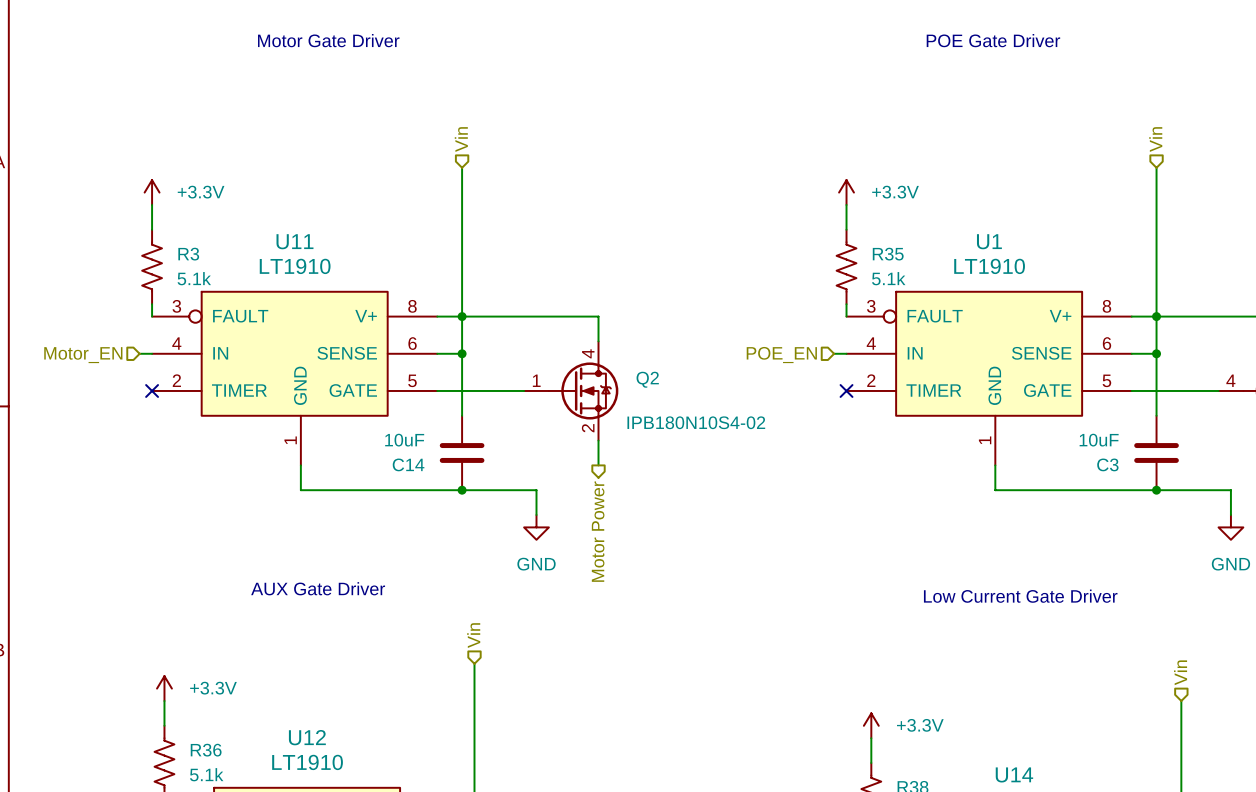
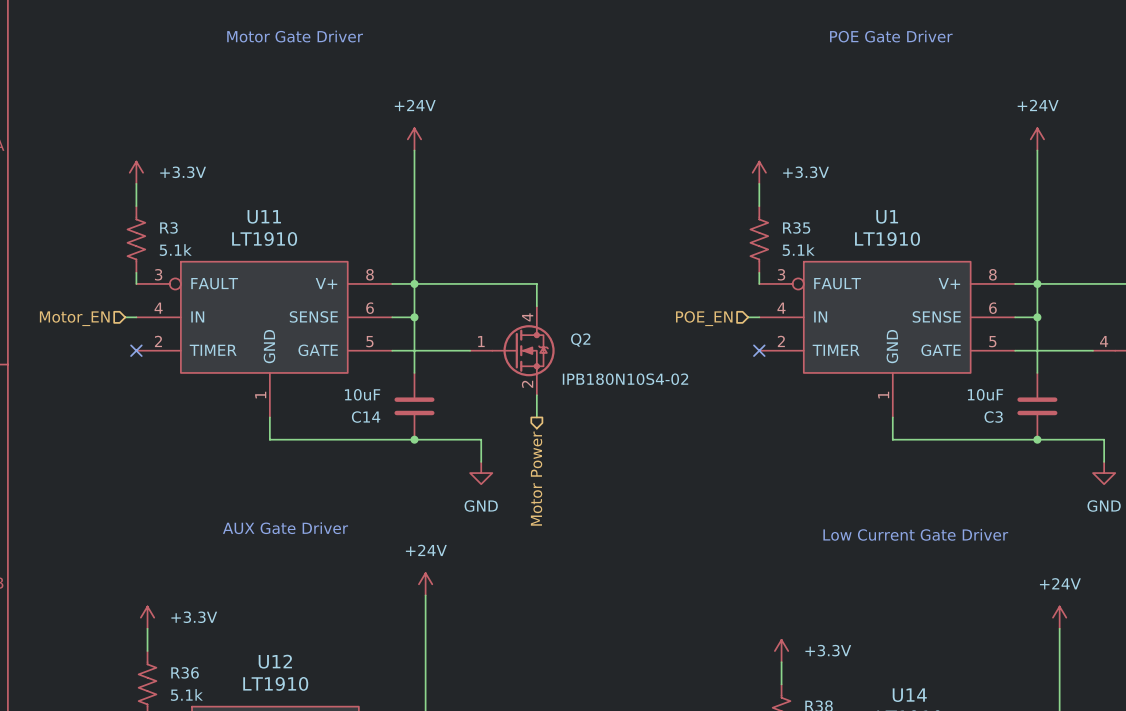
hierarchical label: Vin (461, 139) -> none
hierarchical label: Vin (1155, 139) -> none
power symbol: none -> +24V (414, 139)
power symbol: none -> +24V (1037, 139)
hierarchical label: Vin (473, 635) -> none
power symbol: none -> +24V (425, 584)
hierarchical label: Vin (1180, 672) -> none
power symbol: none -> +24V (1059, 617)

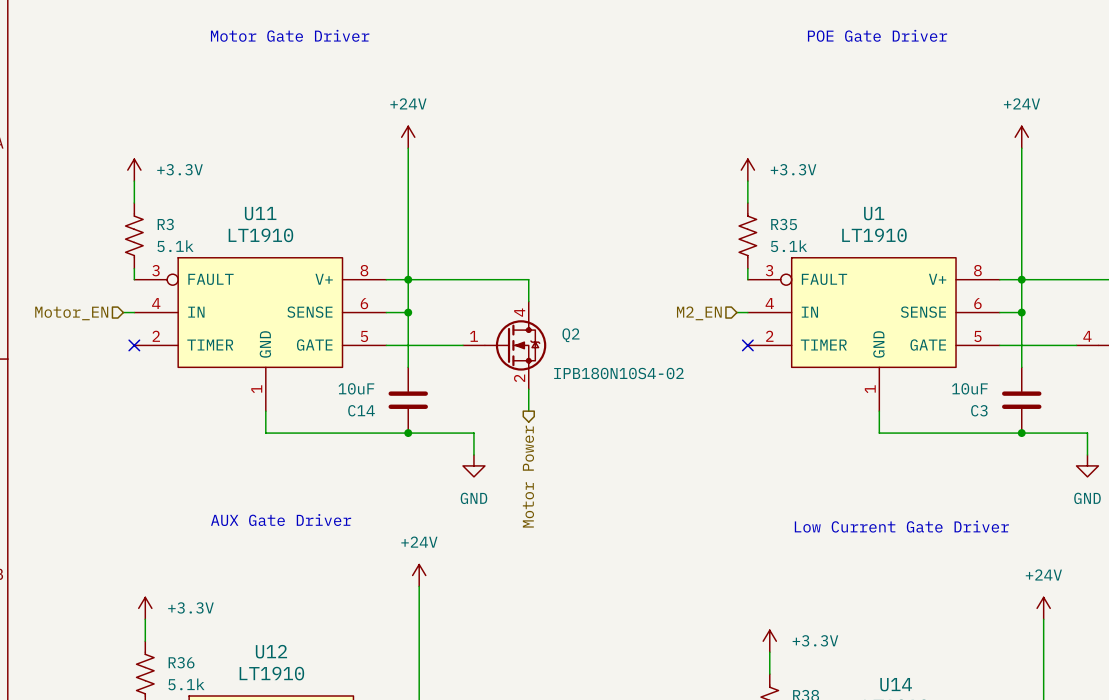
hierarchical label: POE_EN (704, 318) -> M2_EN (699, 313)

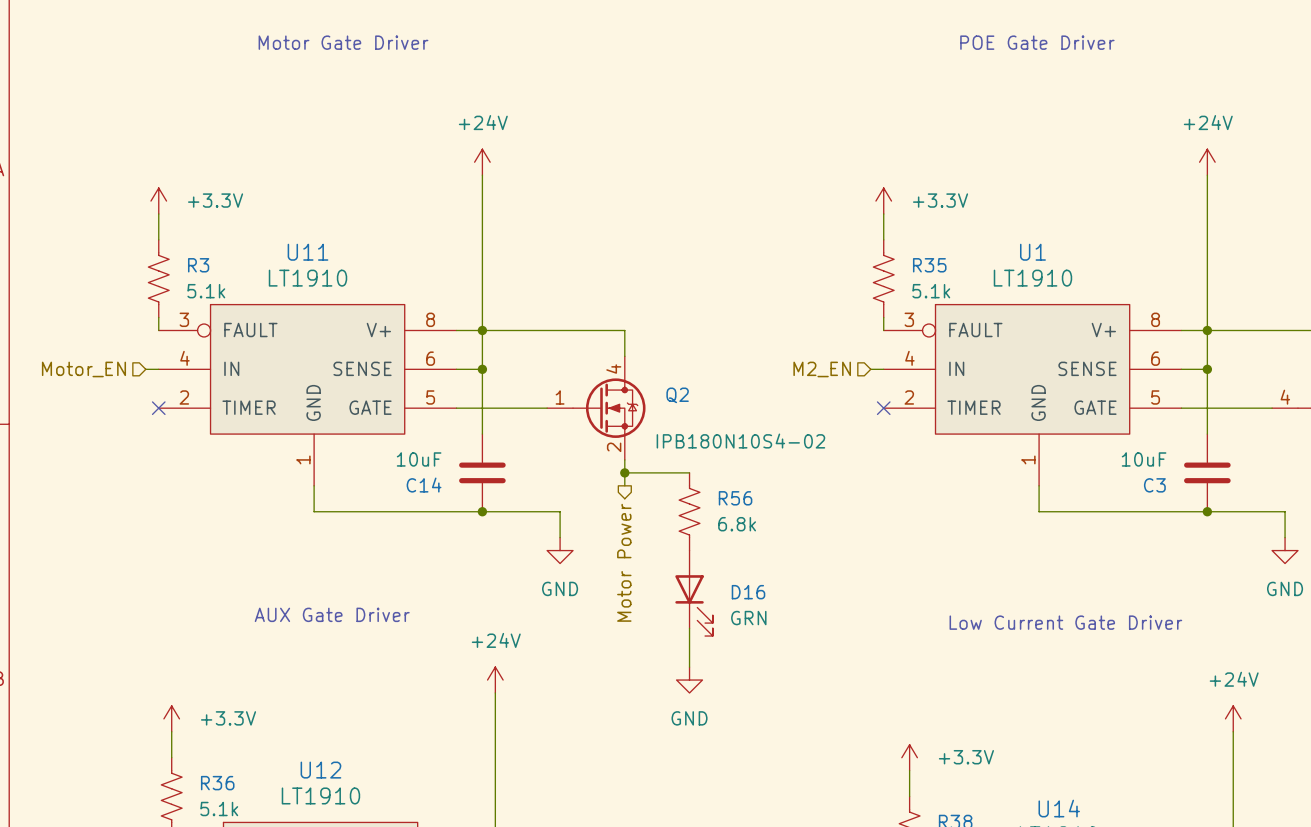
wire: none -> (624, 472) (689, 472)
junction: none -> (624, 472)
R56: none -> 6.8k (689, 511)
D16: none -> GRN (694, 593)
wire: none -> (689, 628) (689, 667)
power symbol: none -> GND (689, 680)

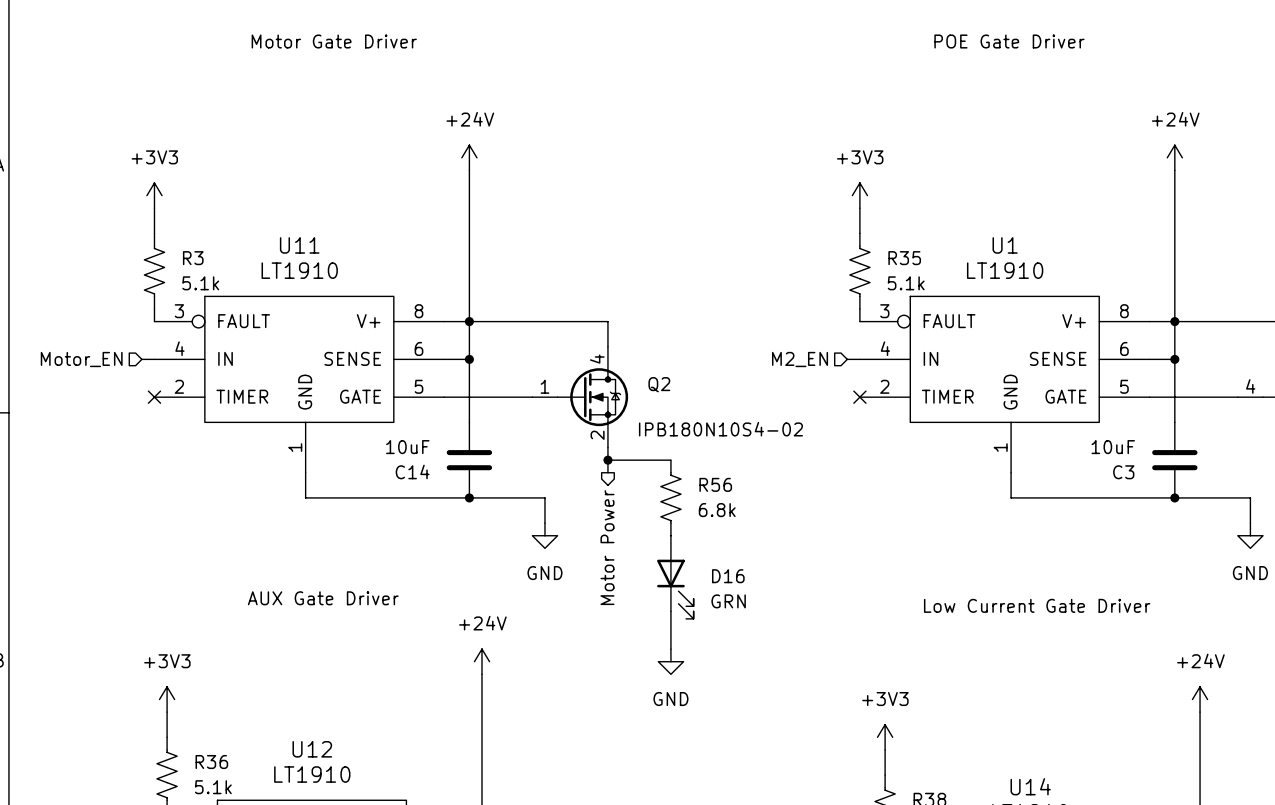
power symbol: +3.3V (158, 201) -> +3V3 (154, 195)
power symbol: +3.3V (883, 201) -> +3V3 (859, 195)
power symbol: +3.3V (171, 718) -> +3V3 (167, 699)
power symbol: +3.3V (909, 757) -> +3V3 (885, 737)

